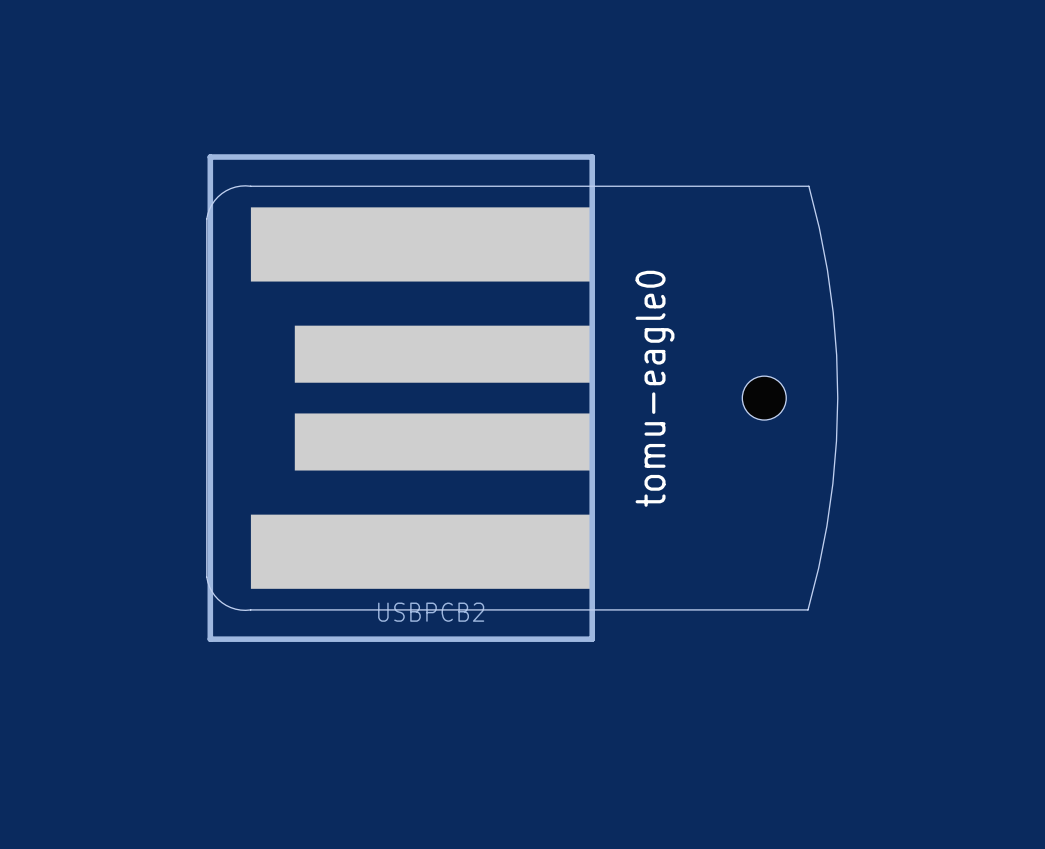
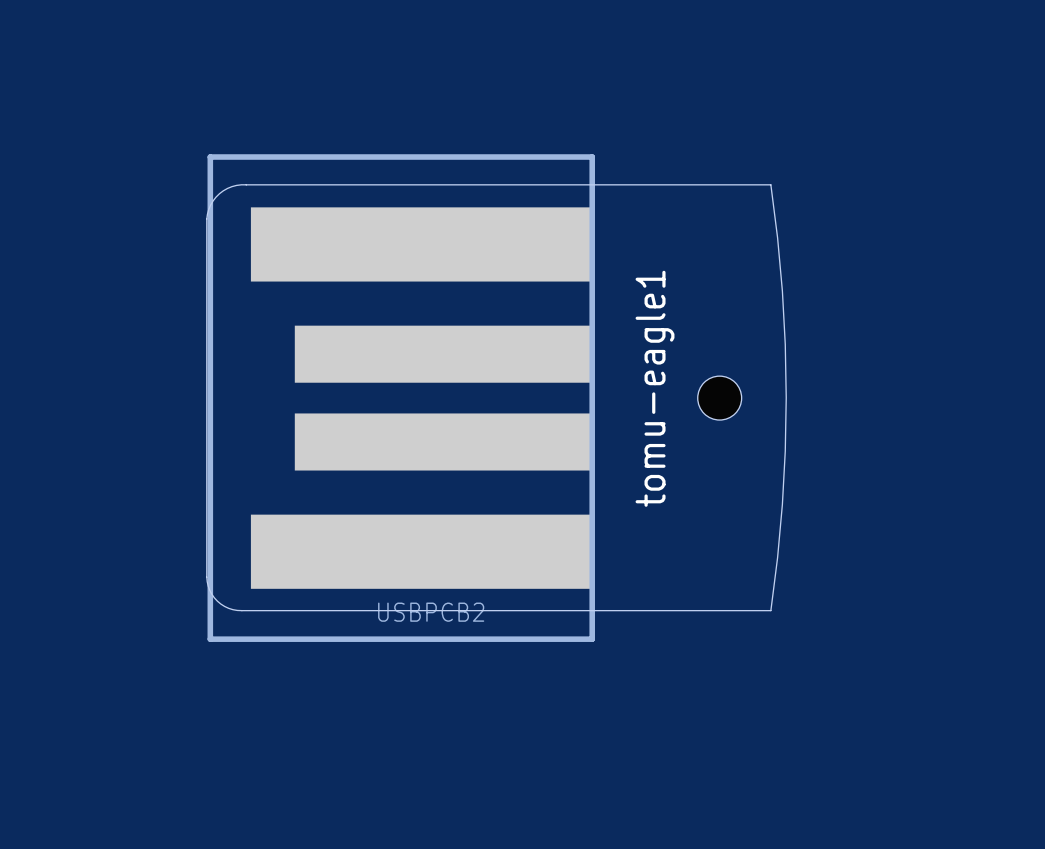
board edge: (206, 218) (209, 209) (218, 196) (226, 190) (240, 186) (808, 186) (827, 269) (836, 355) (837, 398) (832, 483) (818, 568) (808, 609) (240, 610) (226, 605) (218, 599) (209, 586) (206, 577) -> (206, 218) (210, 205) (219, 193) (227, 188) (241, 184) (770, 184) (782, 291) (786, 397) (782, 504) (770, 610) (237, 610) (224, 606) (217, 601) (209, 590) (206, 577)
text: tomu-eagle0 (655, 388) -> tomu-eagle1 (655, 388)
hole position: (764, 398) -> (719, 398)

